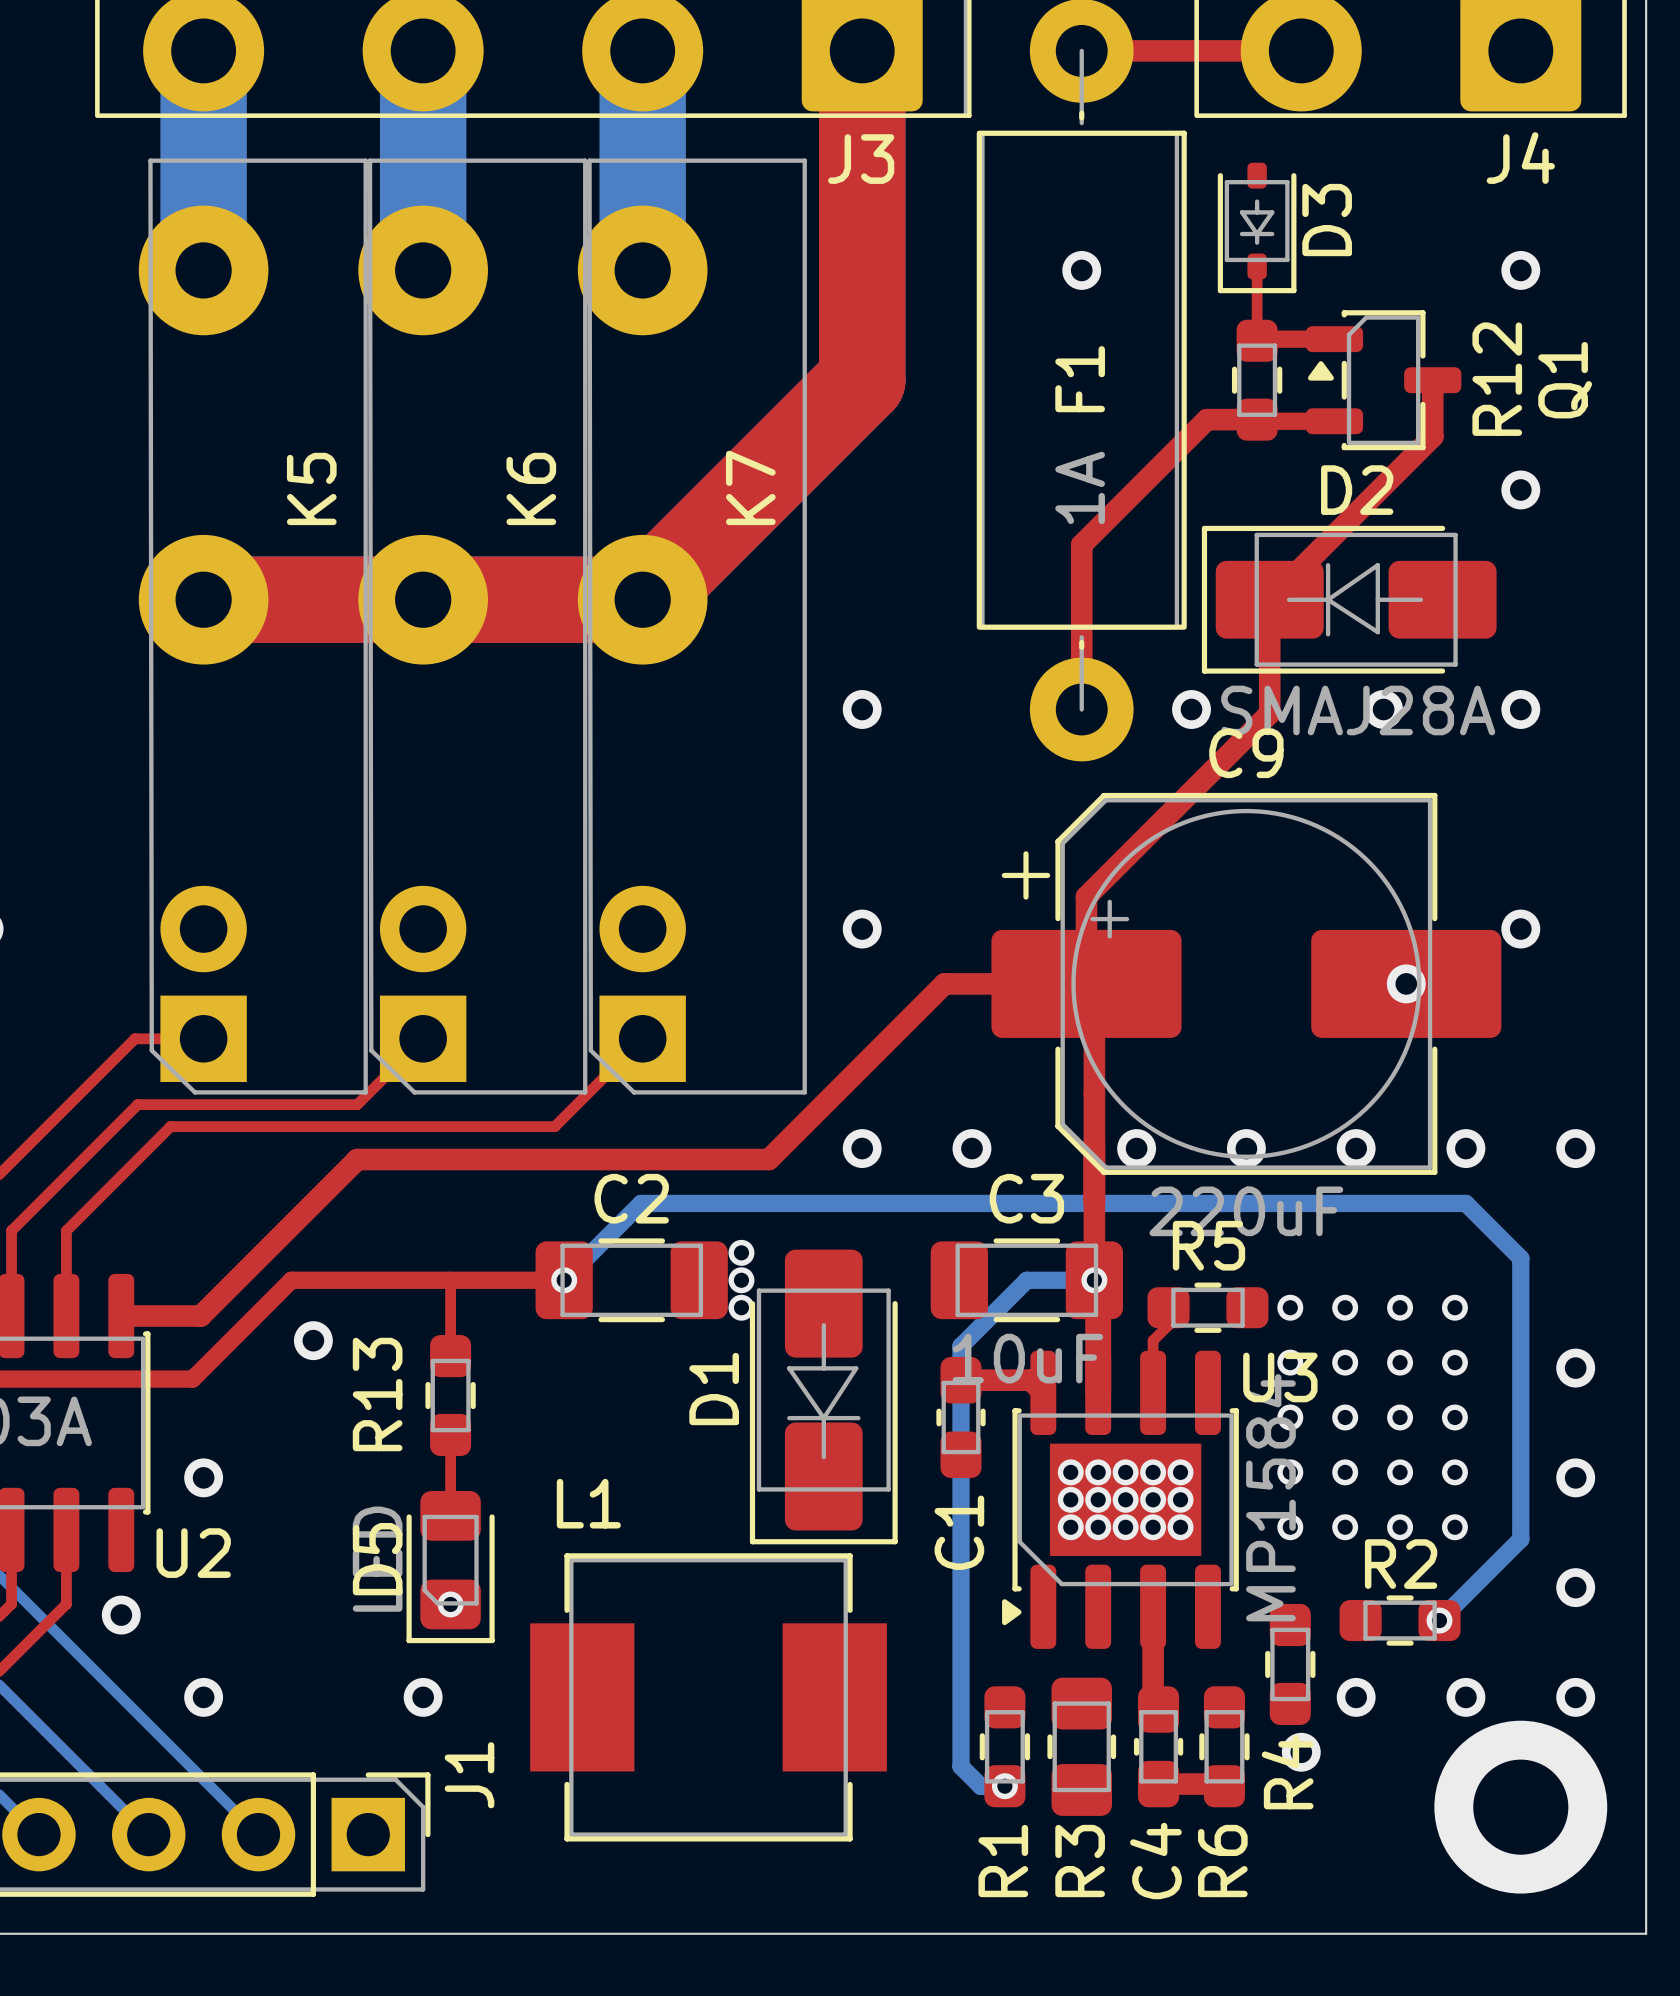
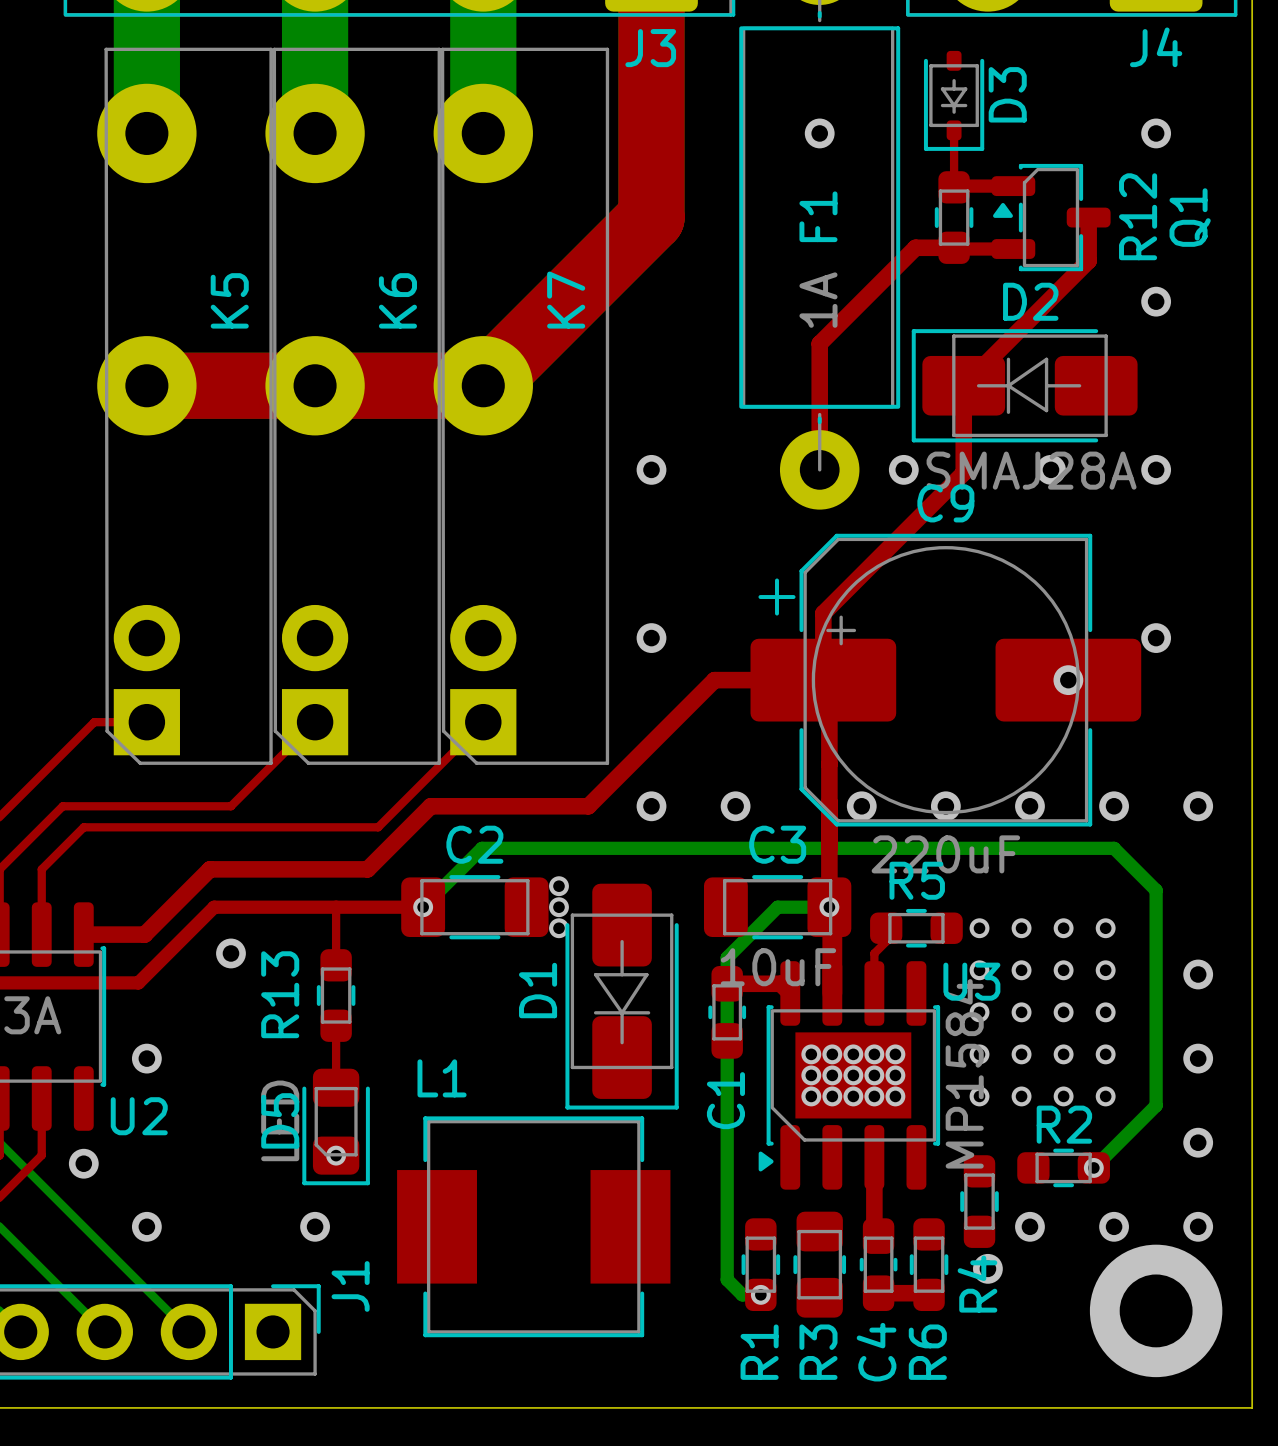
top track: (357, 1104) (137, 1104) (93, 1148) -> (264, 772) (230, 806) (62, 806)
top track: (554, 1126) (170, 1126) (121, 1176) -> (416, 789) (378, 827) (83, 827)
top track: (779, 1148) (768, 1159) (357, 1159) (285, 1230) -> (588, 806) (430, 806) (367, 869) (209, 869)

